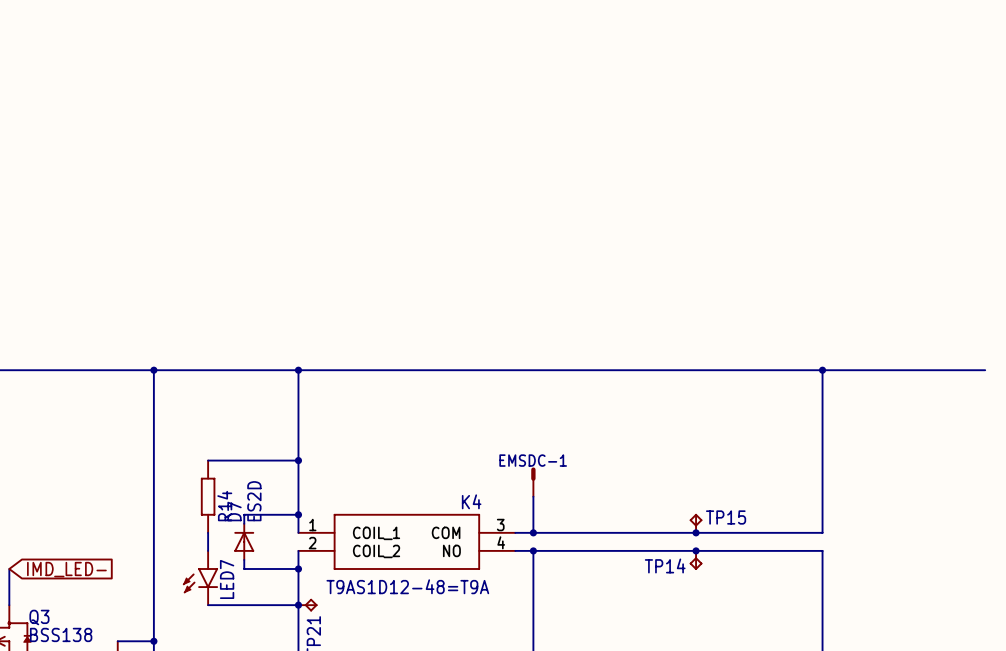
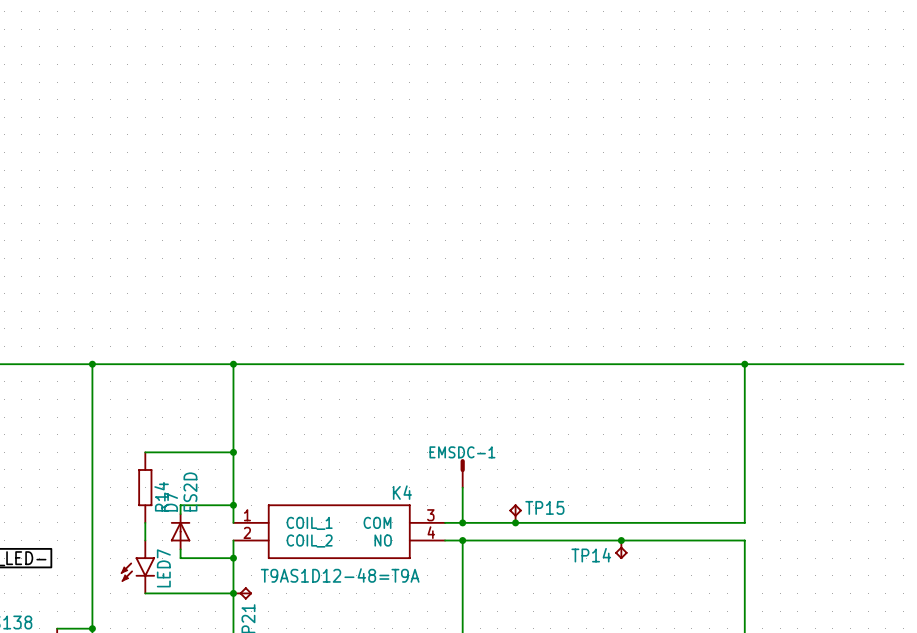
TP15 position: (696, 523) -> (515, 513)
junction: none -> (515, 522)
junction: (696, 532) -> none

